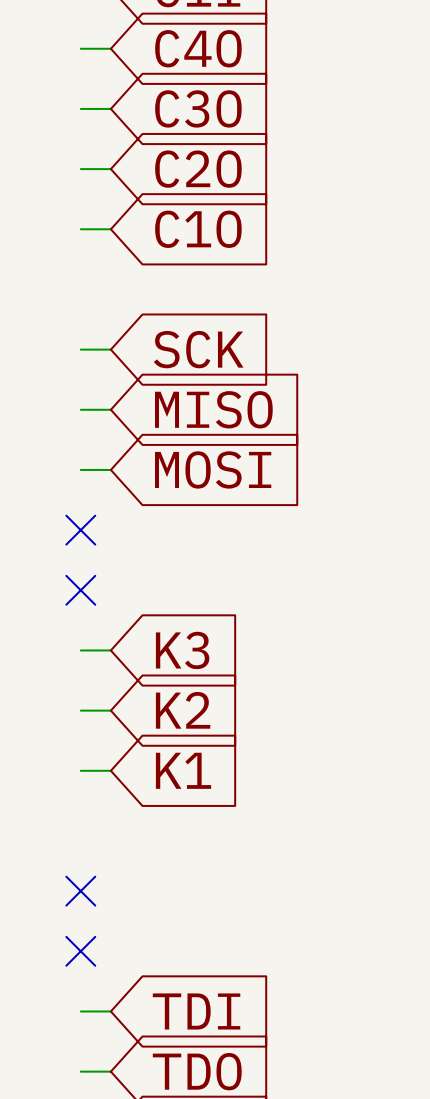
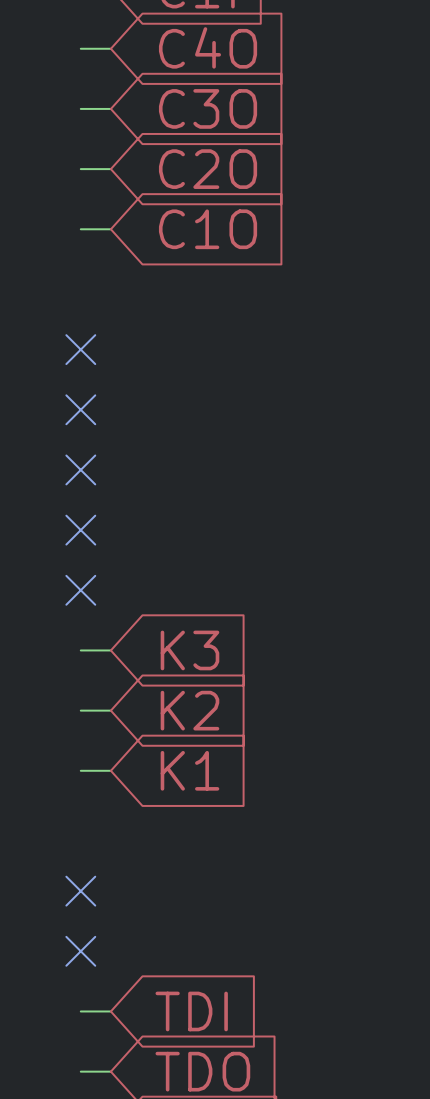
wire: (80, 349) (110, 349) -> none
no-connect mark: none -> (80, 349)
global label: SCK (198, 349) -> none
wire: (80, 409) (110, 409) -> none
no-connect mark: none -> (80, 409)
global label: MISO (213, 409) -> none
wire: (80, 469) (110, 469) -> none
no-connect mark: none -> (80, 469)
global label: MOSI (213, 469) -> none

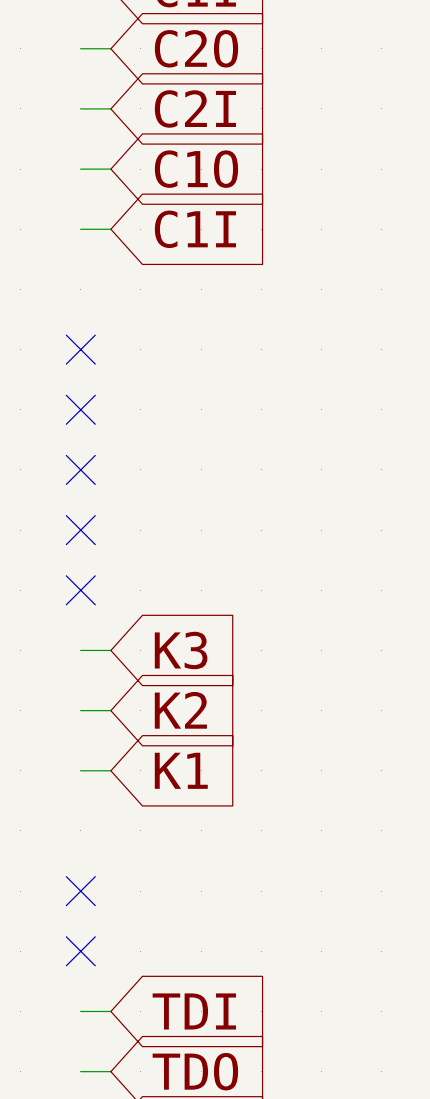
global label: C4O (208, 47) -> C2O (196, 48)
global label: C3O (208, 108) -> C2I (195, 108)
global label: C2O (208, 169) -> C1O (196, 169)
global label: C1O (208, 229) -> C1I (195, 229)

